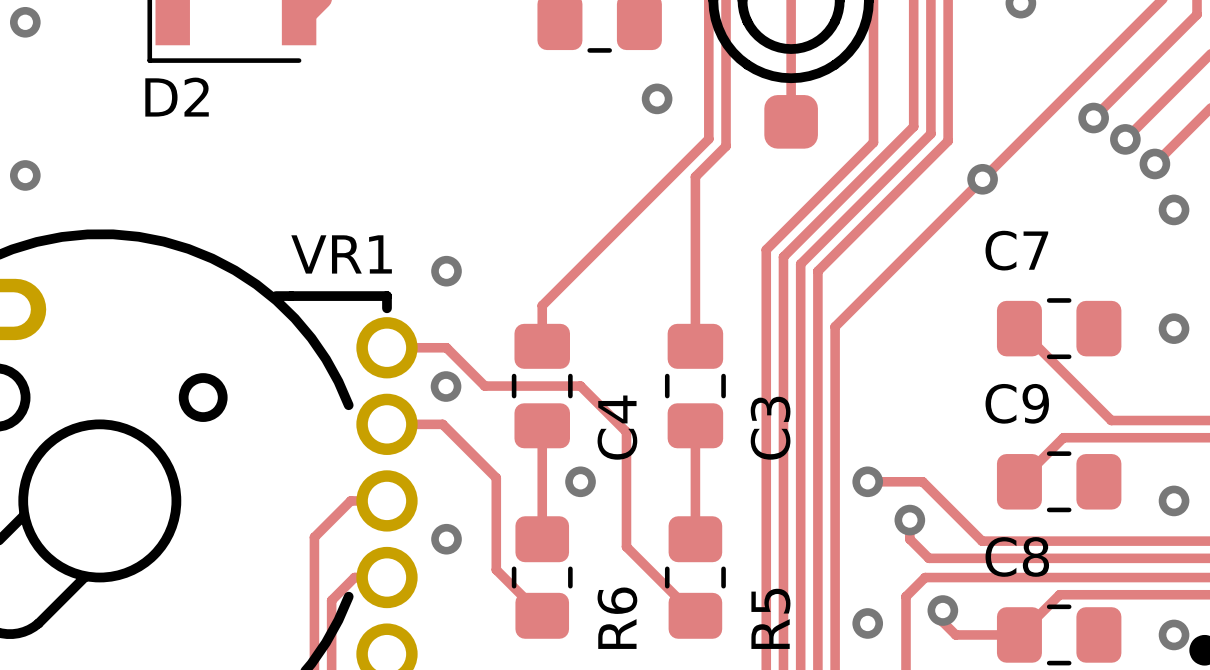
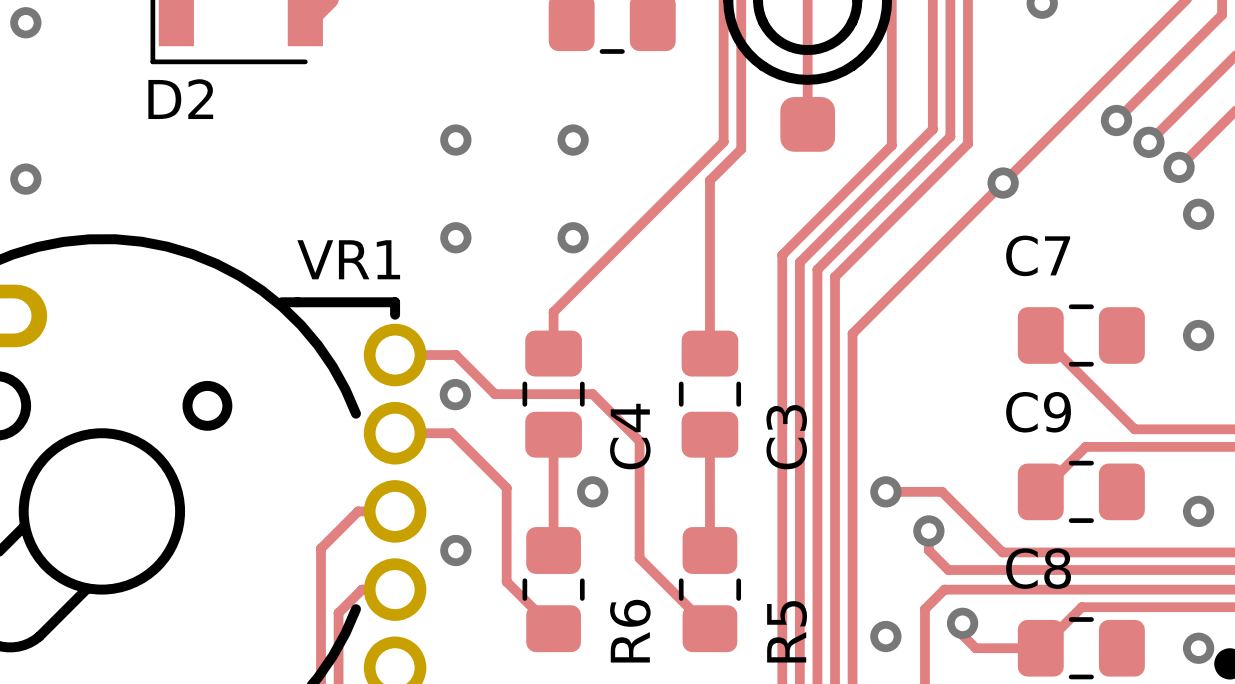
via: (657, 98) -> none
via: none -> (455, 140)
via: none -> (573, 140)
via: none -> (573, 237)
via position: (446, 271) -> (455, 237)

